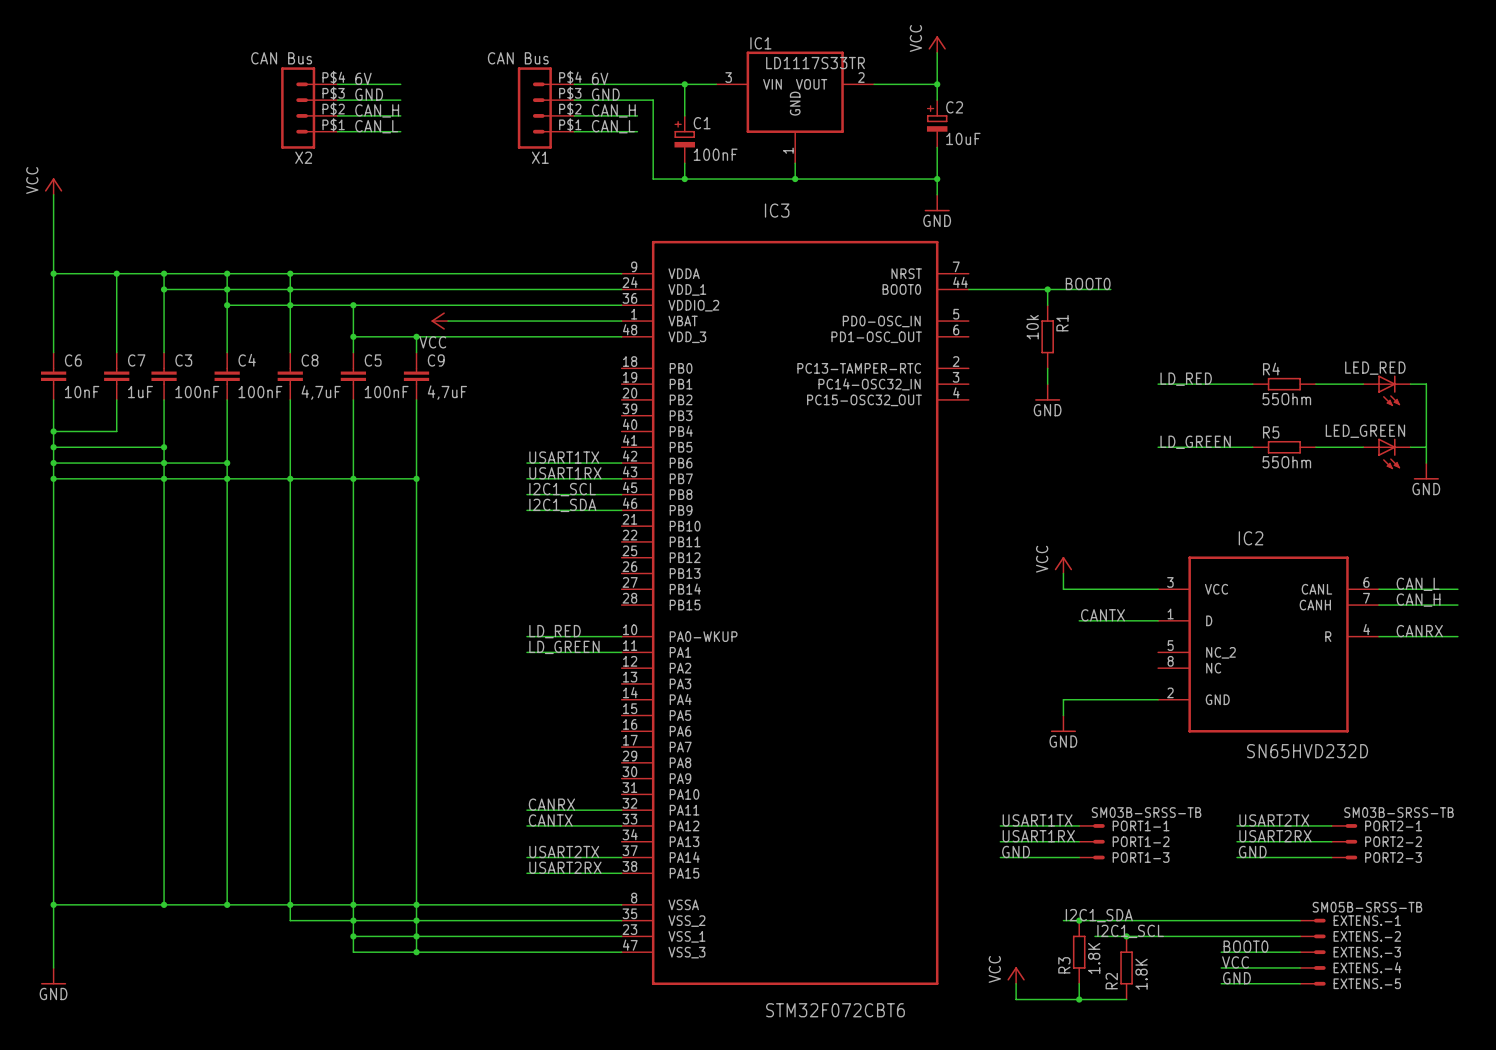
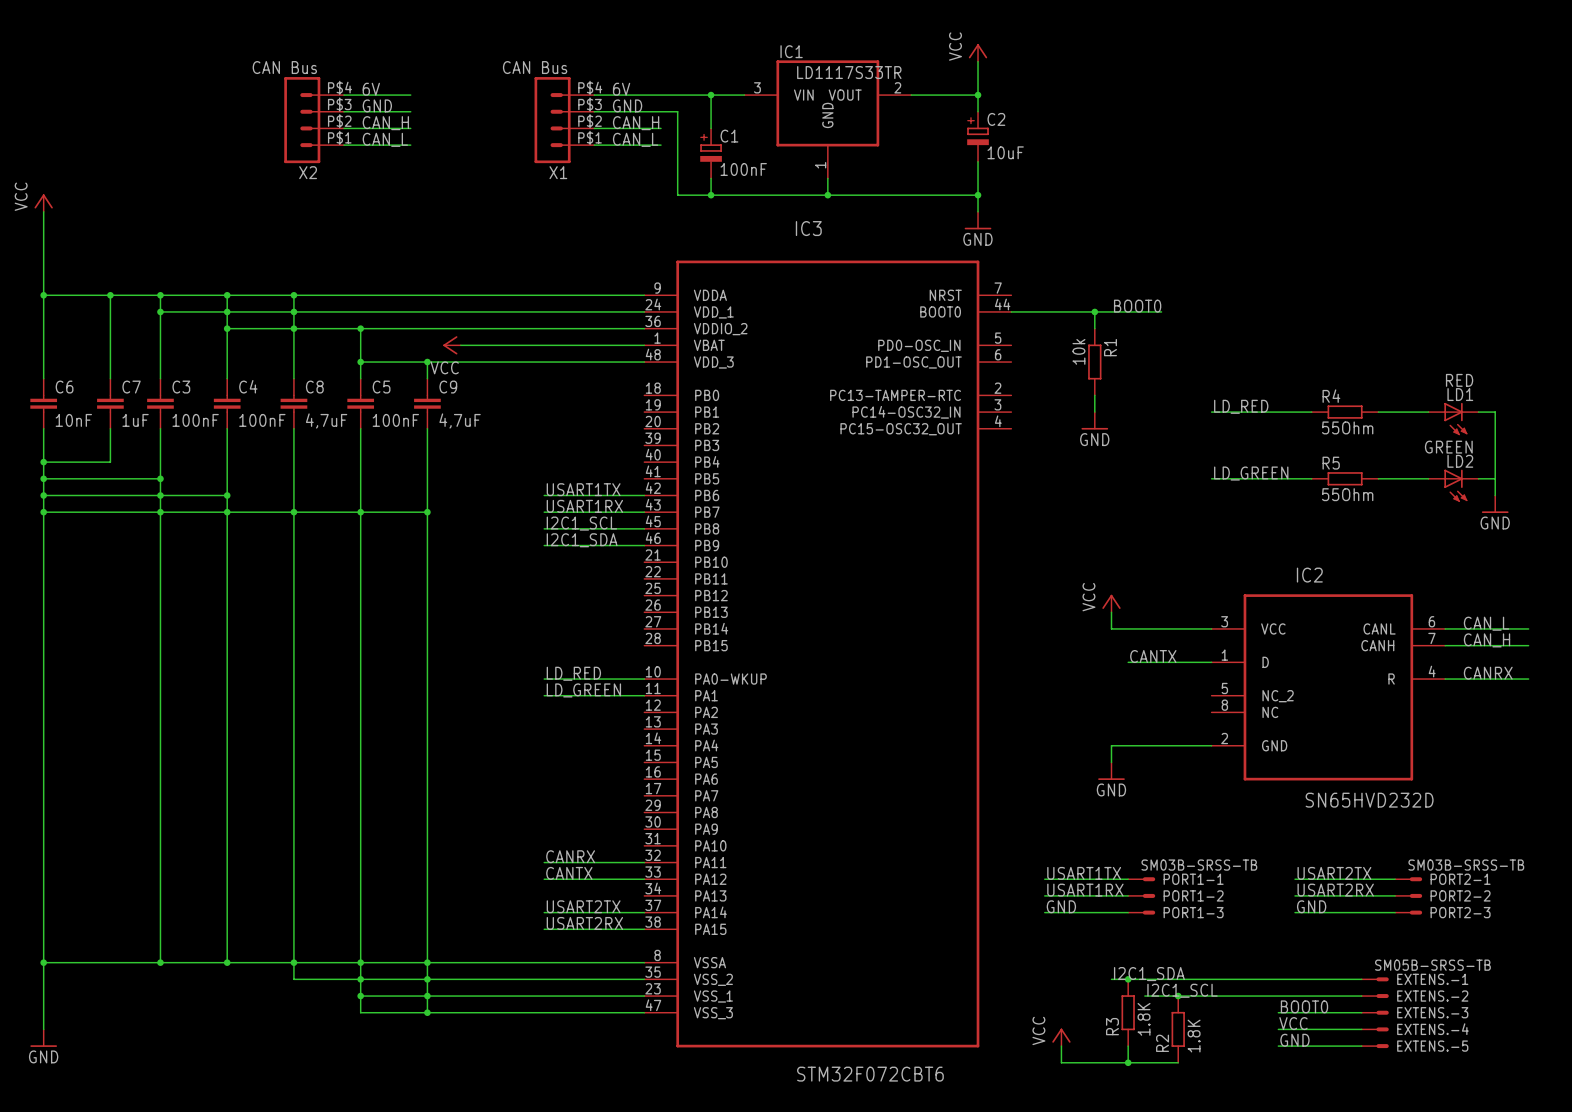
LED_RED value: none -> RED (1459, 380)
LED_RED name: LED_RED (1375, 368) -> LD1 (1460, 394)
LED_GREEN value: none -> GREEN (1448, 447)
LED_GREEN name: LED_GREEN (1365, 431) -> LD2 (1460, 461)

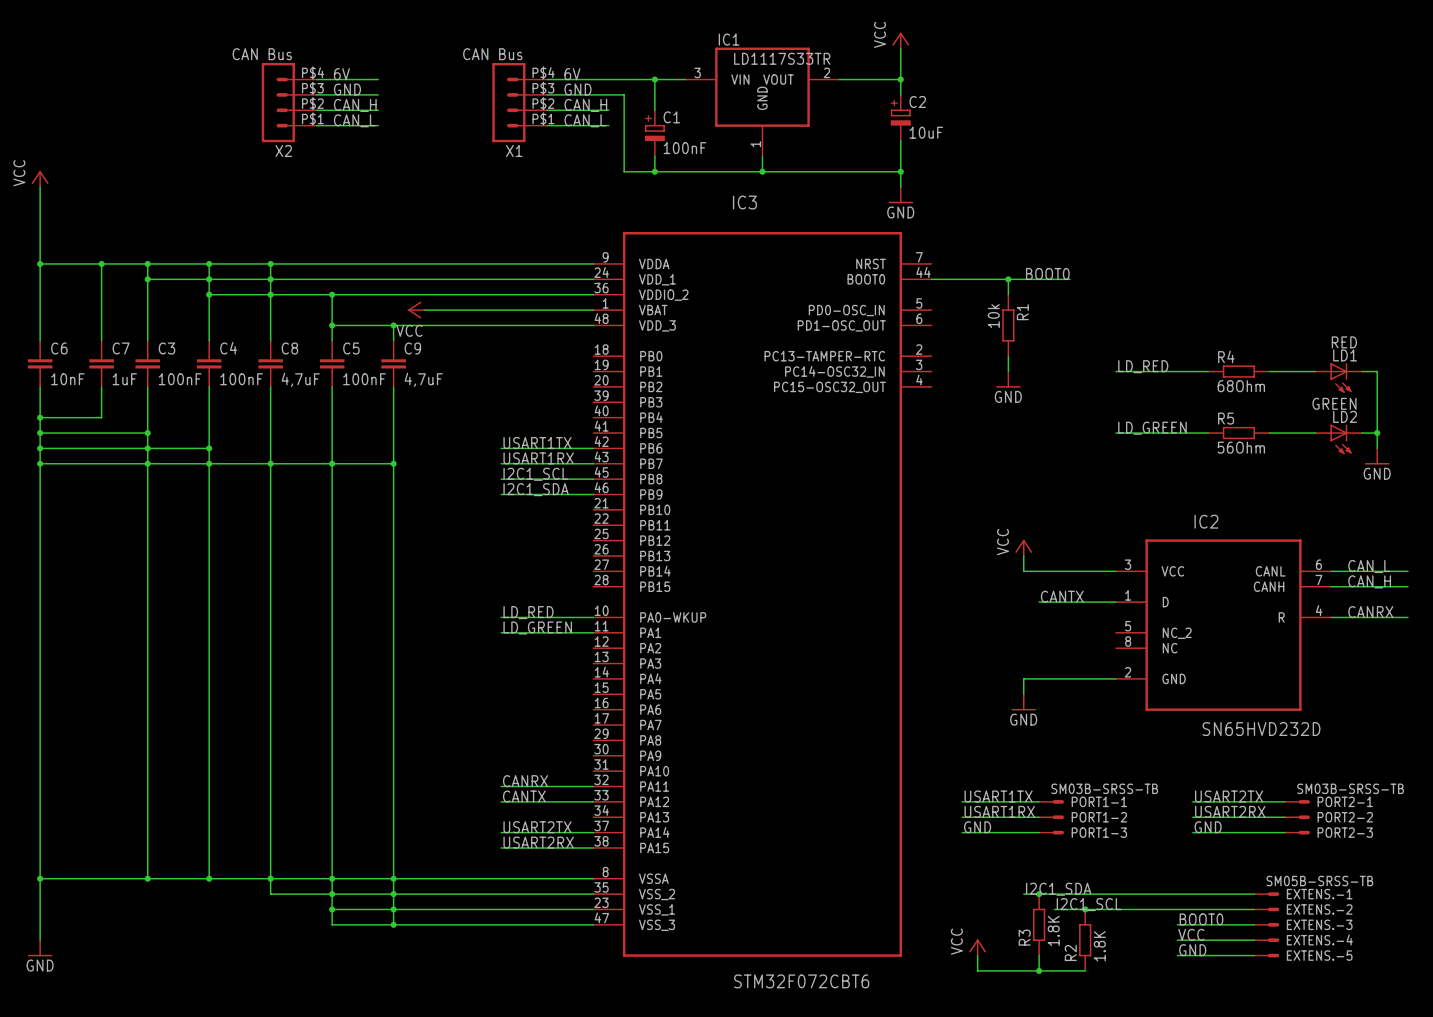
R4 value: 55Ohm (1347, 427) -> 68Ohm (1241, 386)
junction: none -> (1377, 433)
R5 value: 55Ohm (1347, 494) -> 56Ohm (1241, 447)

